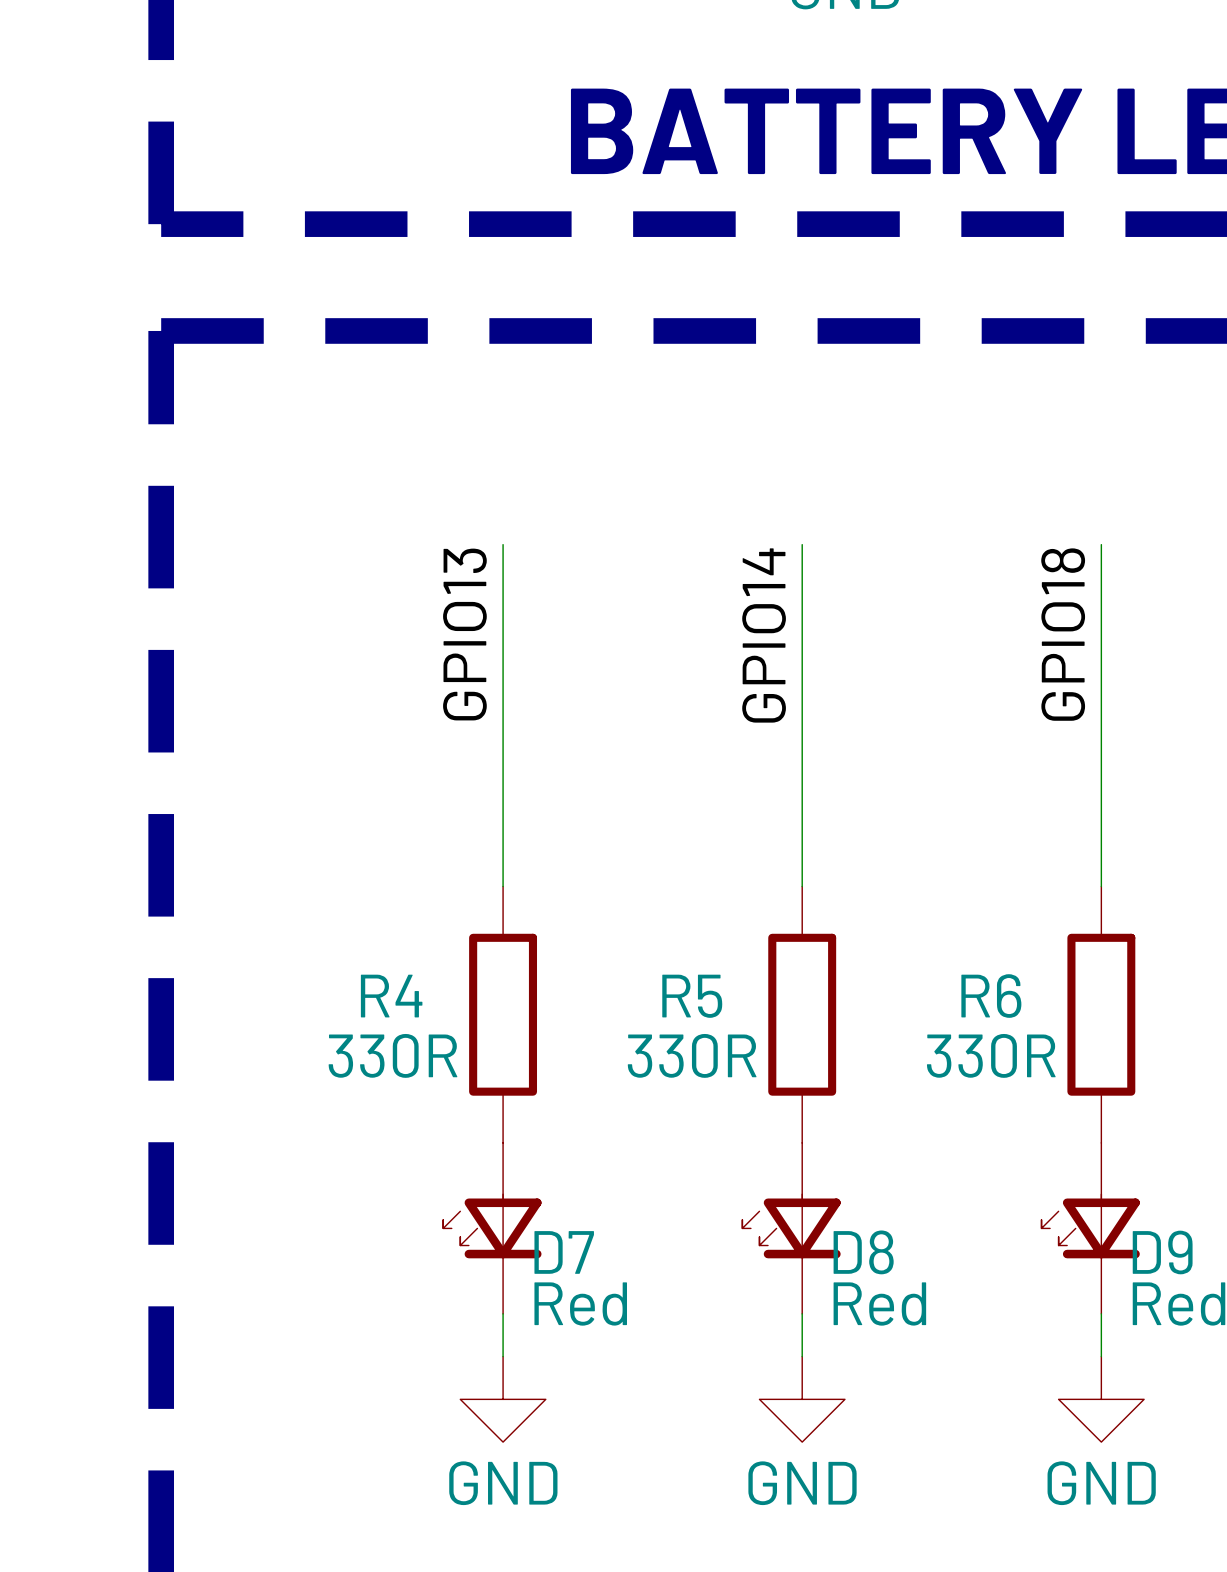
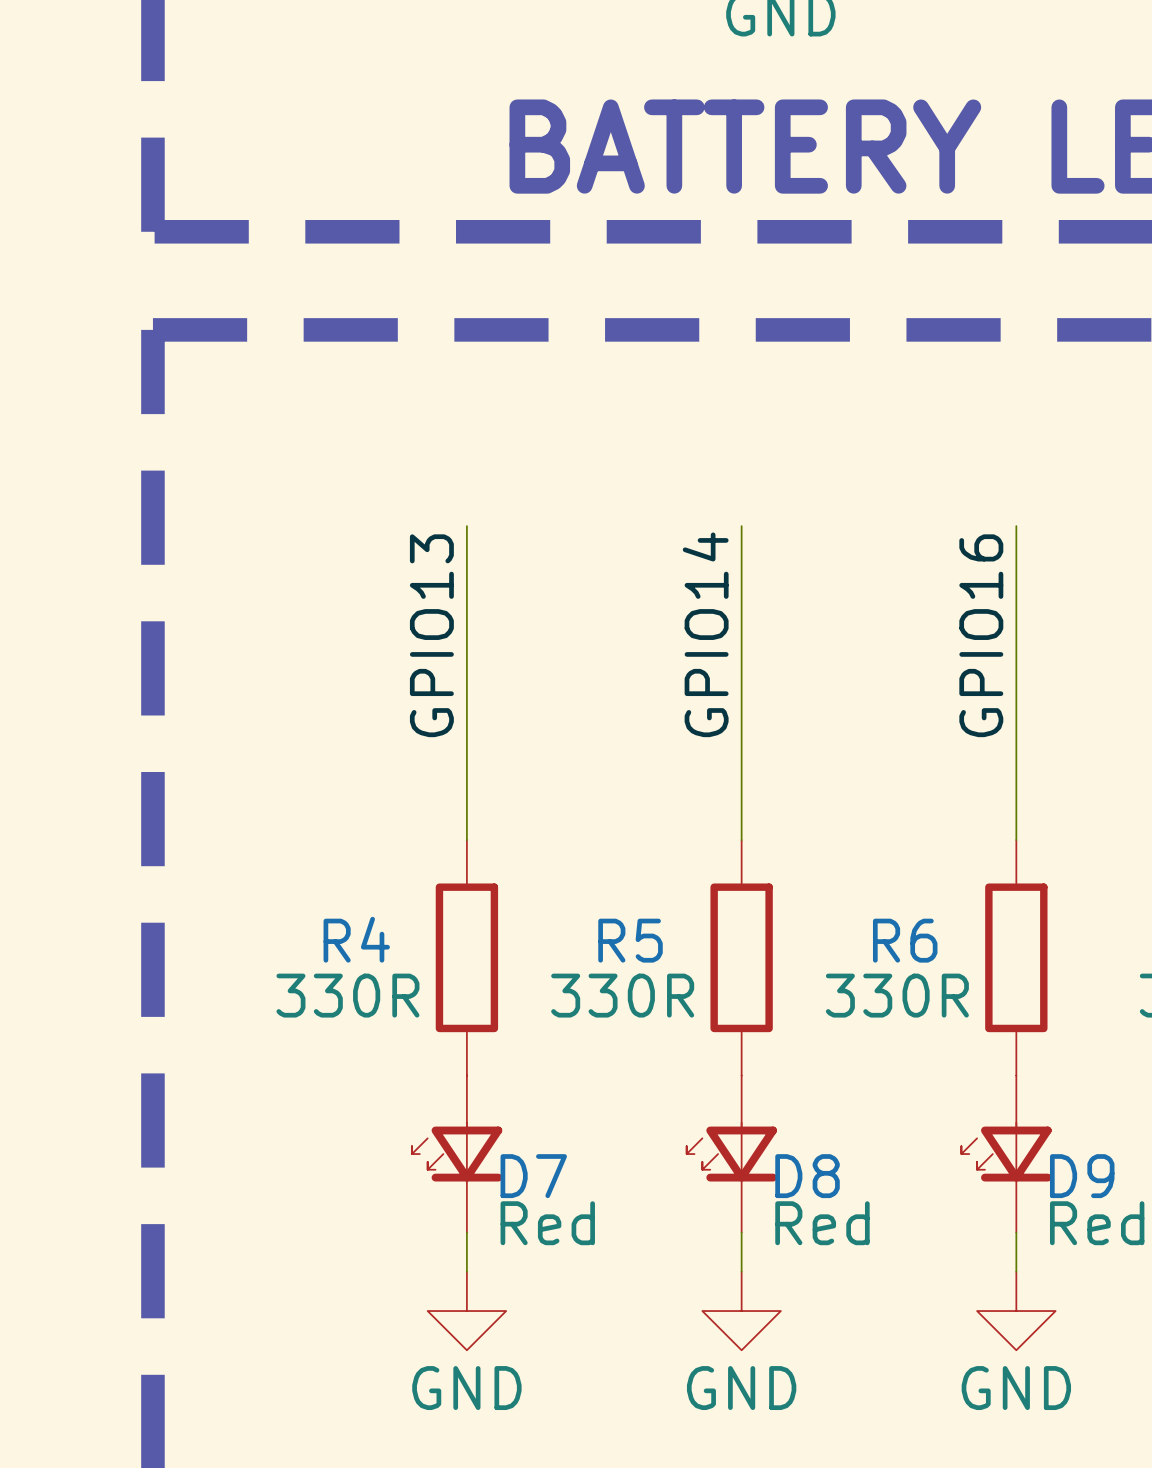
label: GPIO18 (1063, 634) -> GPIO16 (981, 635)

